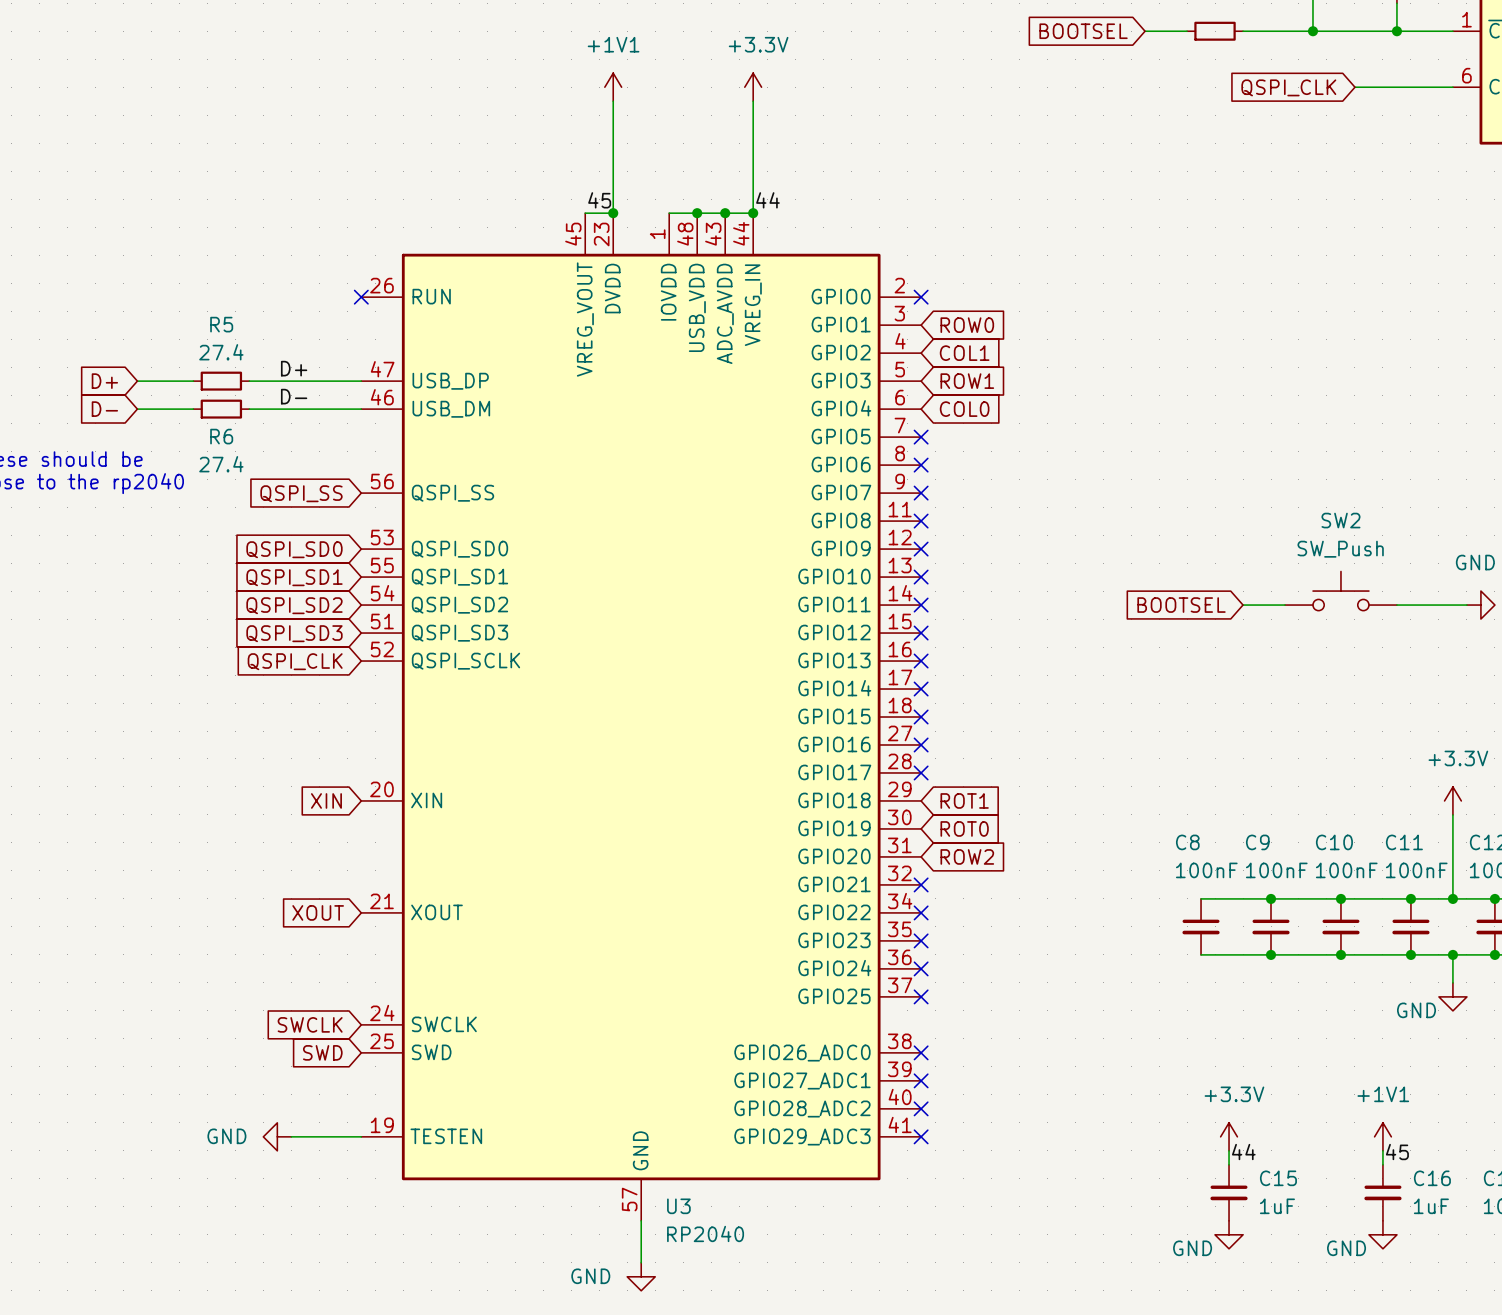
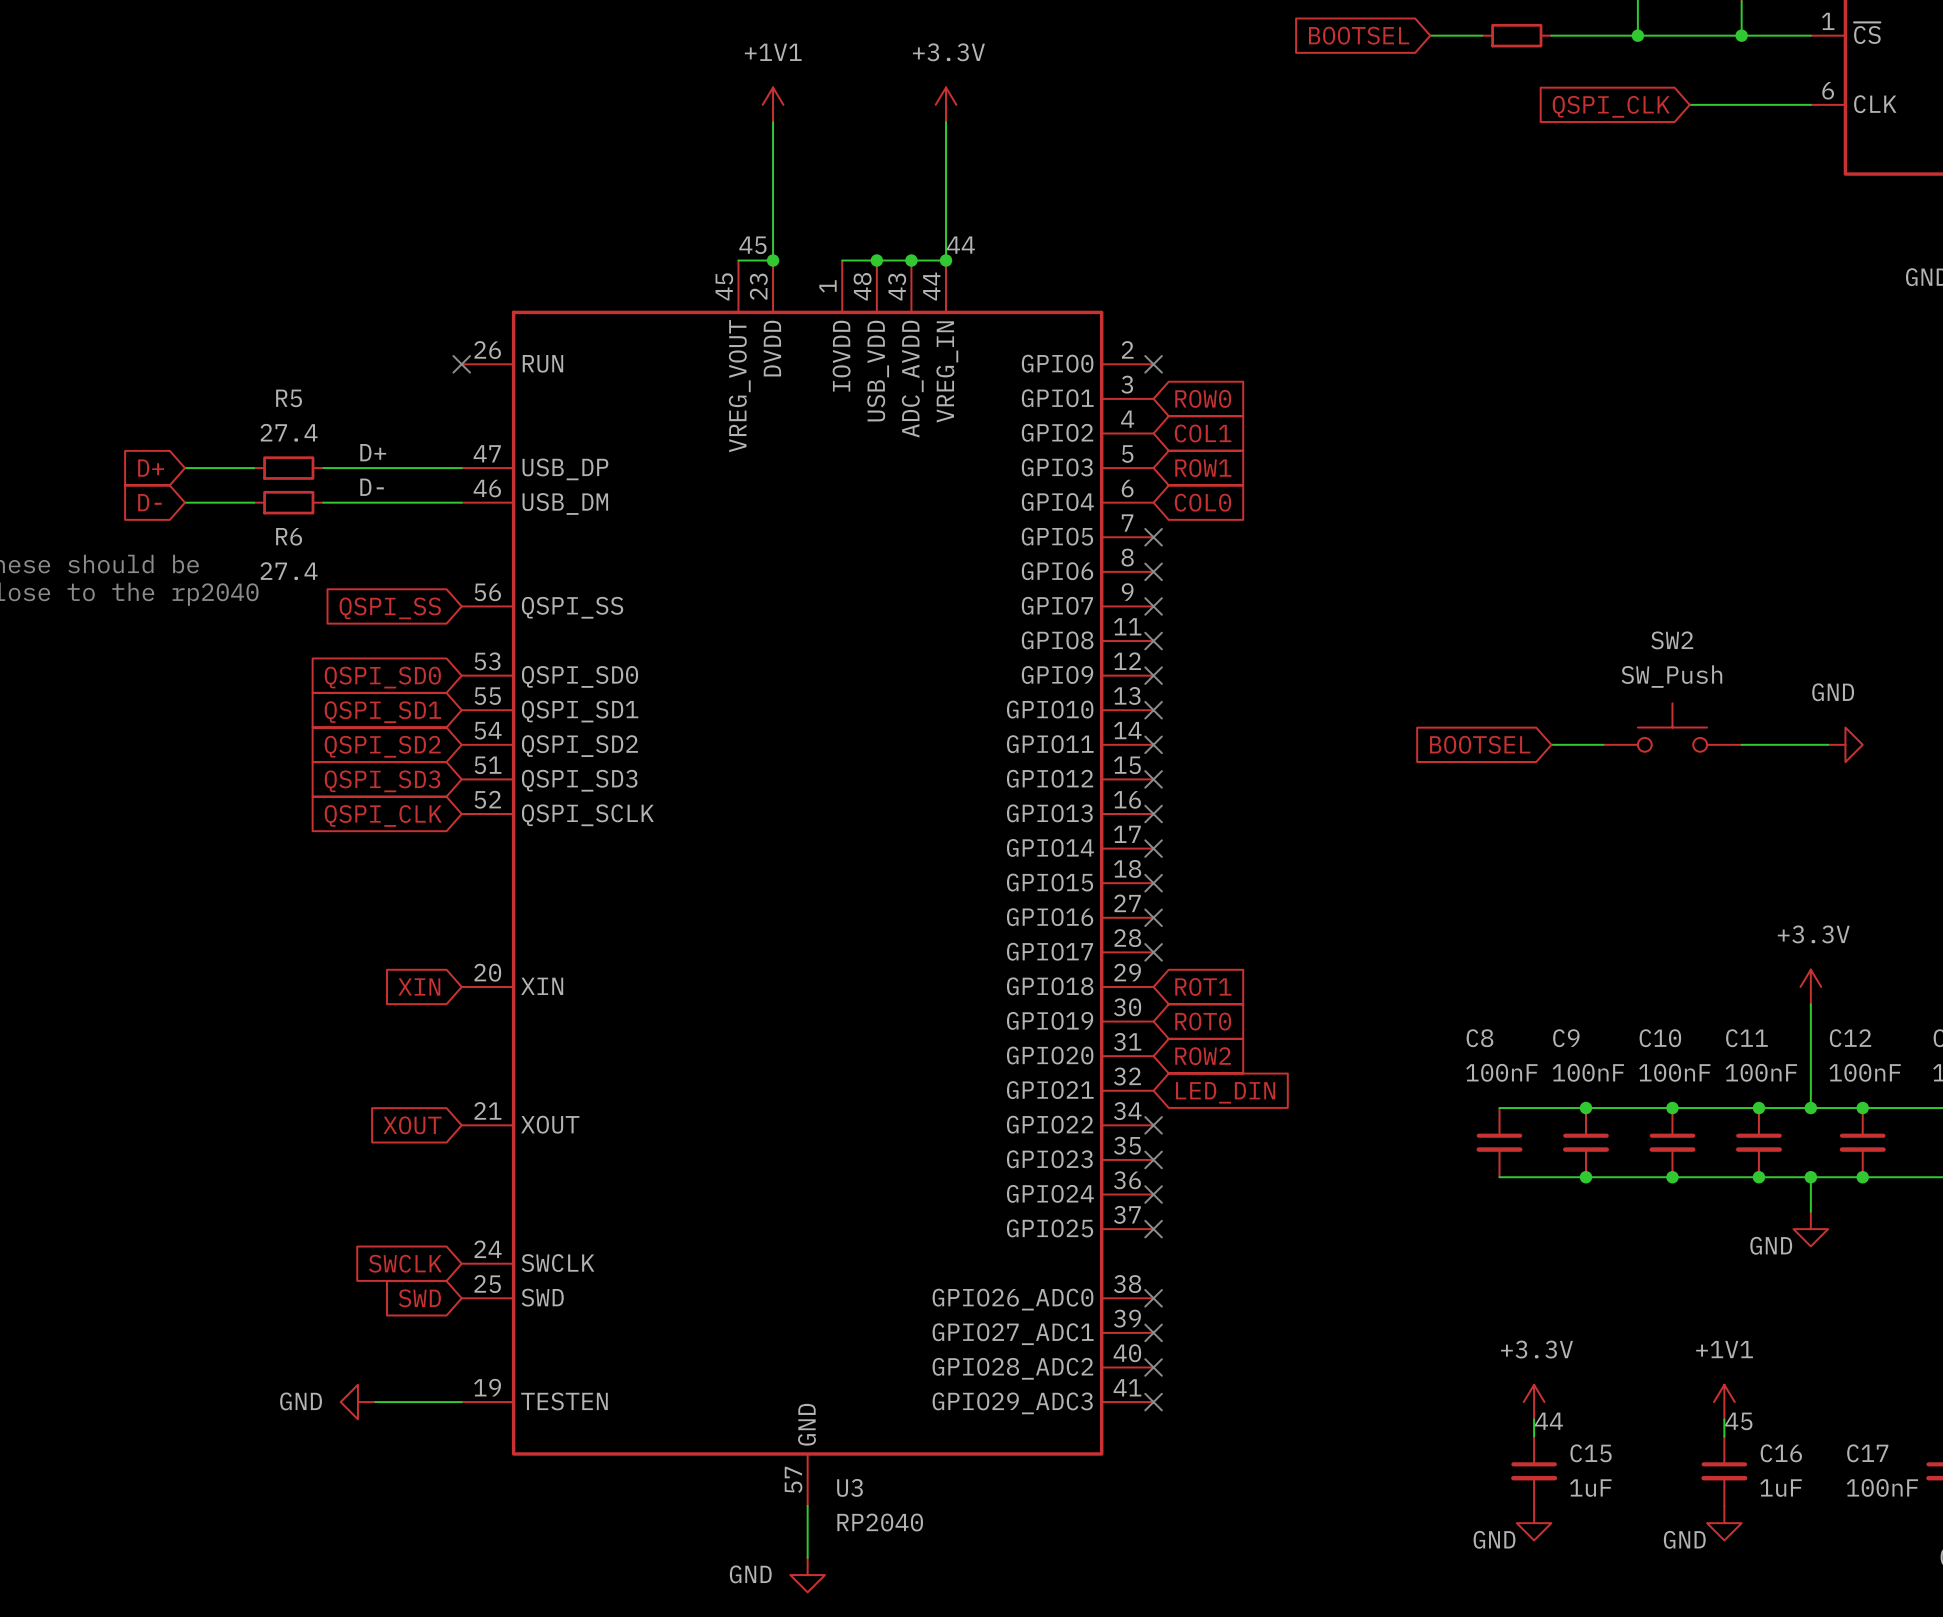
no-connect mark: (921, 884) -> none
global label: none -> LED_DIN (1225, 1092)

